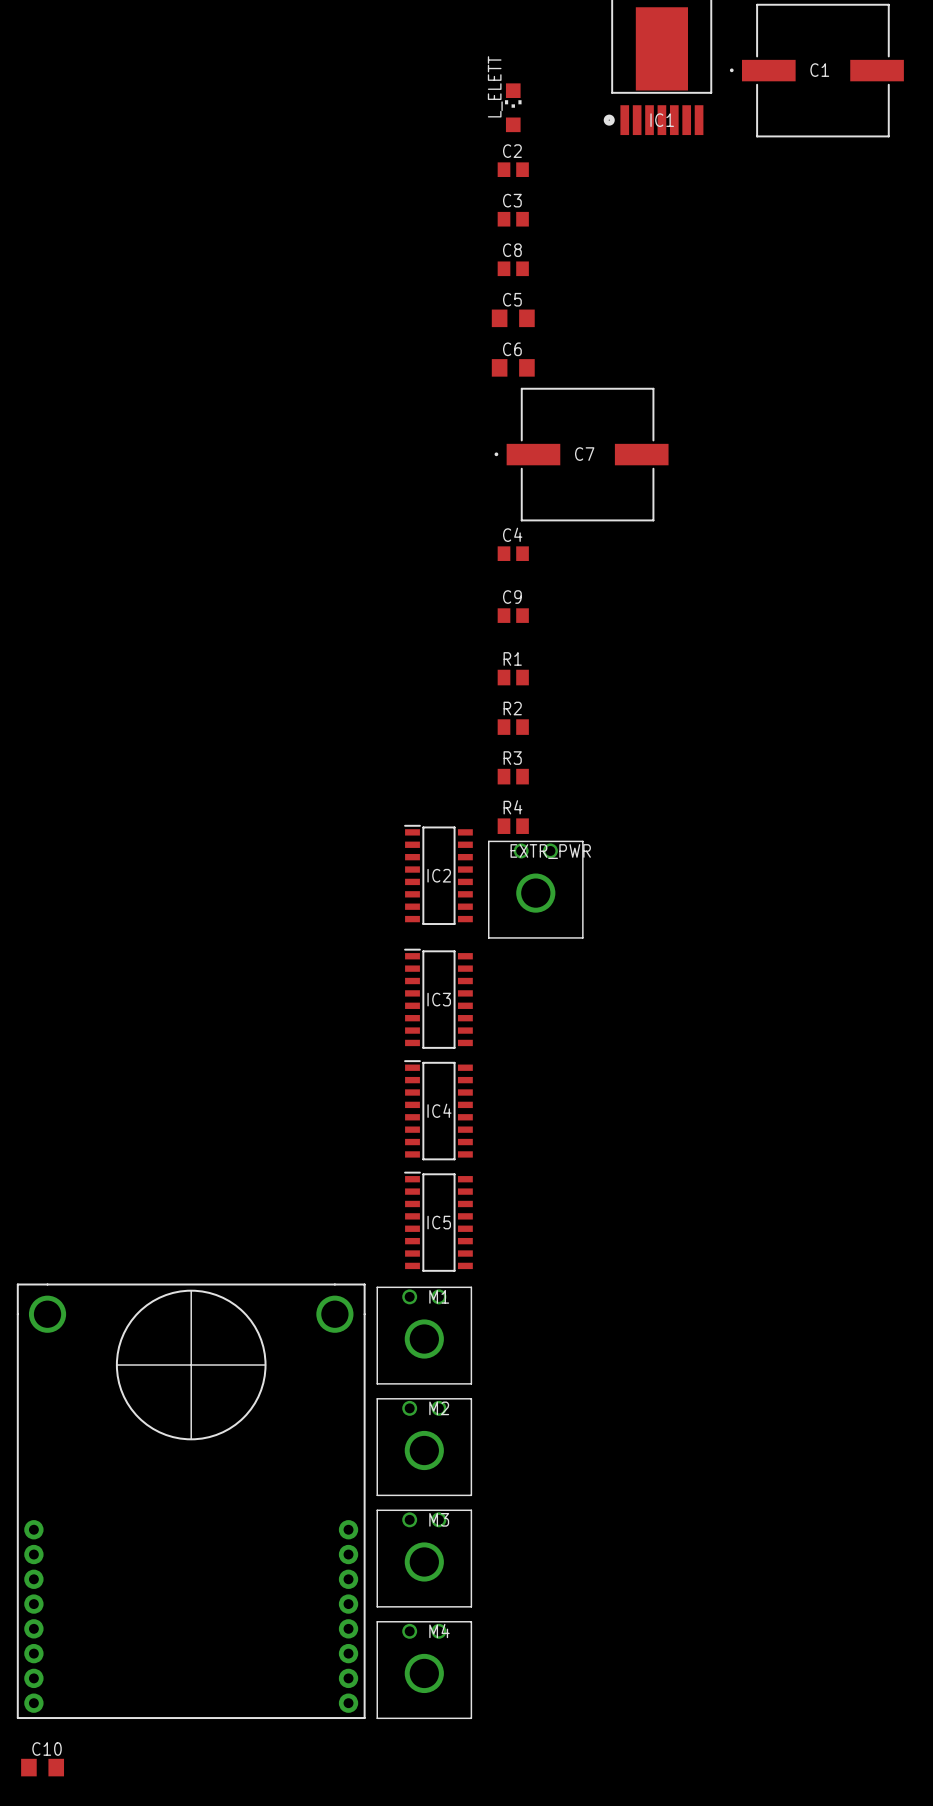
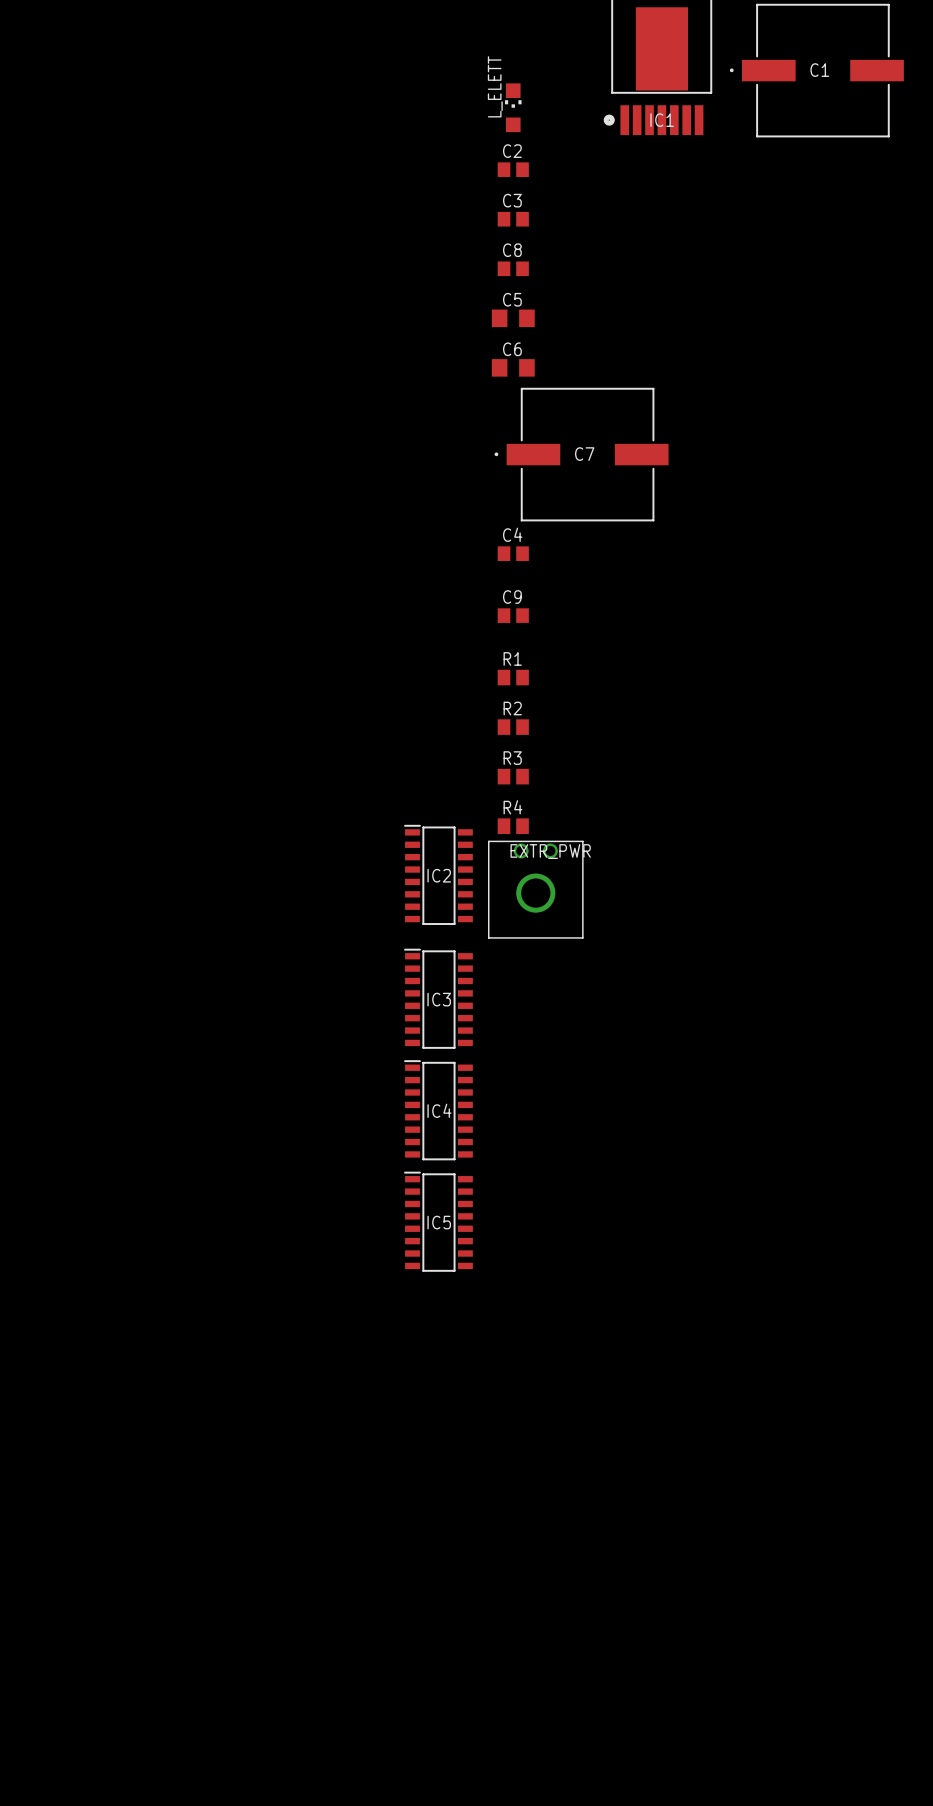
M1: (424, 1335) -> none
M2: (424, 1447) -> none
part: (191, 1501) -> none
M3: (424, 1558) -> none
M4: (424, 1670) -> none
C10: (42, 1767) -> none

